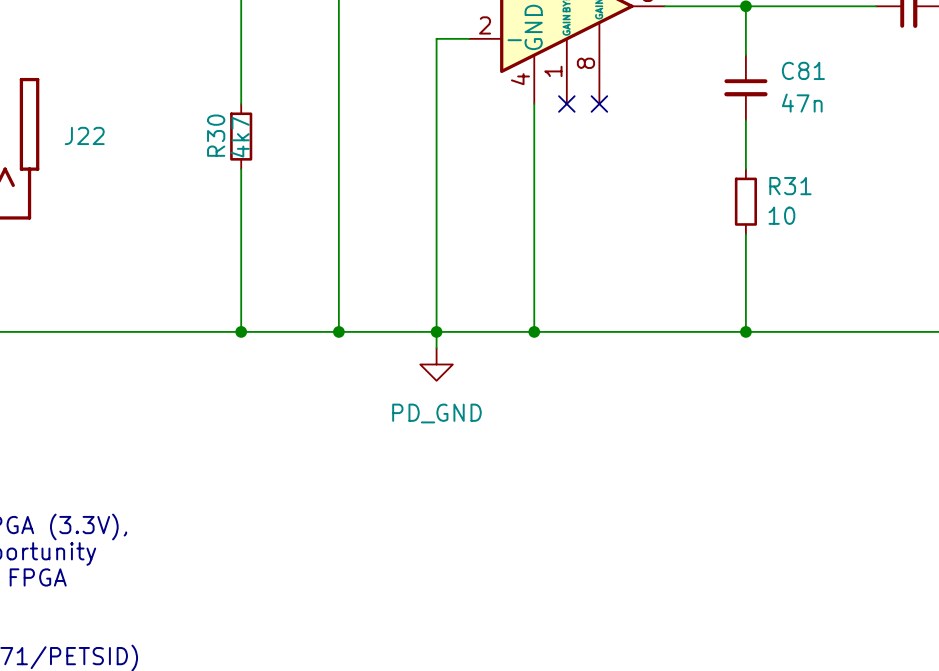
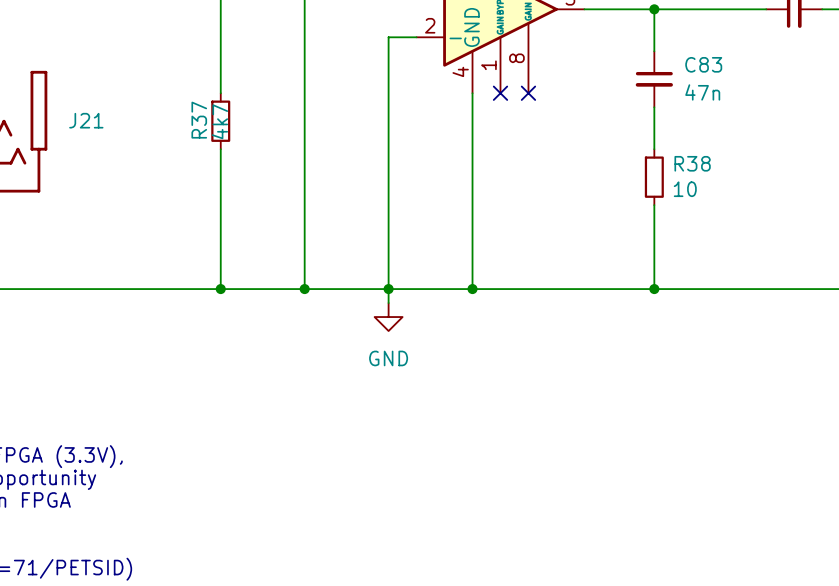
C81 name: C81 (803, 70) -> C83 (703, 64)
J22 name: J22 (84, 135) -> J21 (86, 120)
R30 name: R30 (216, 135) -> R37 (199, 120)
R31 name: R31 (790, 186) -> R38 (692, 163)
power symbol: PD_GND (436, 364) -> GND (388, 317)

